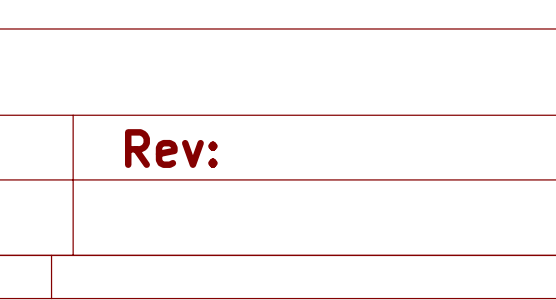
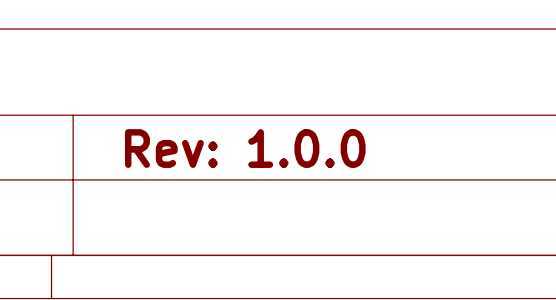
title block: Rev: (171, 148) -> Rev: 1.0.0 (245, 148)

